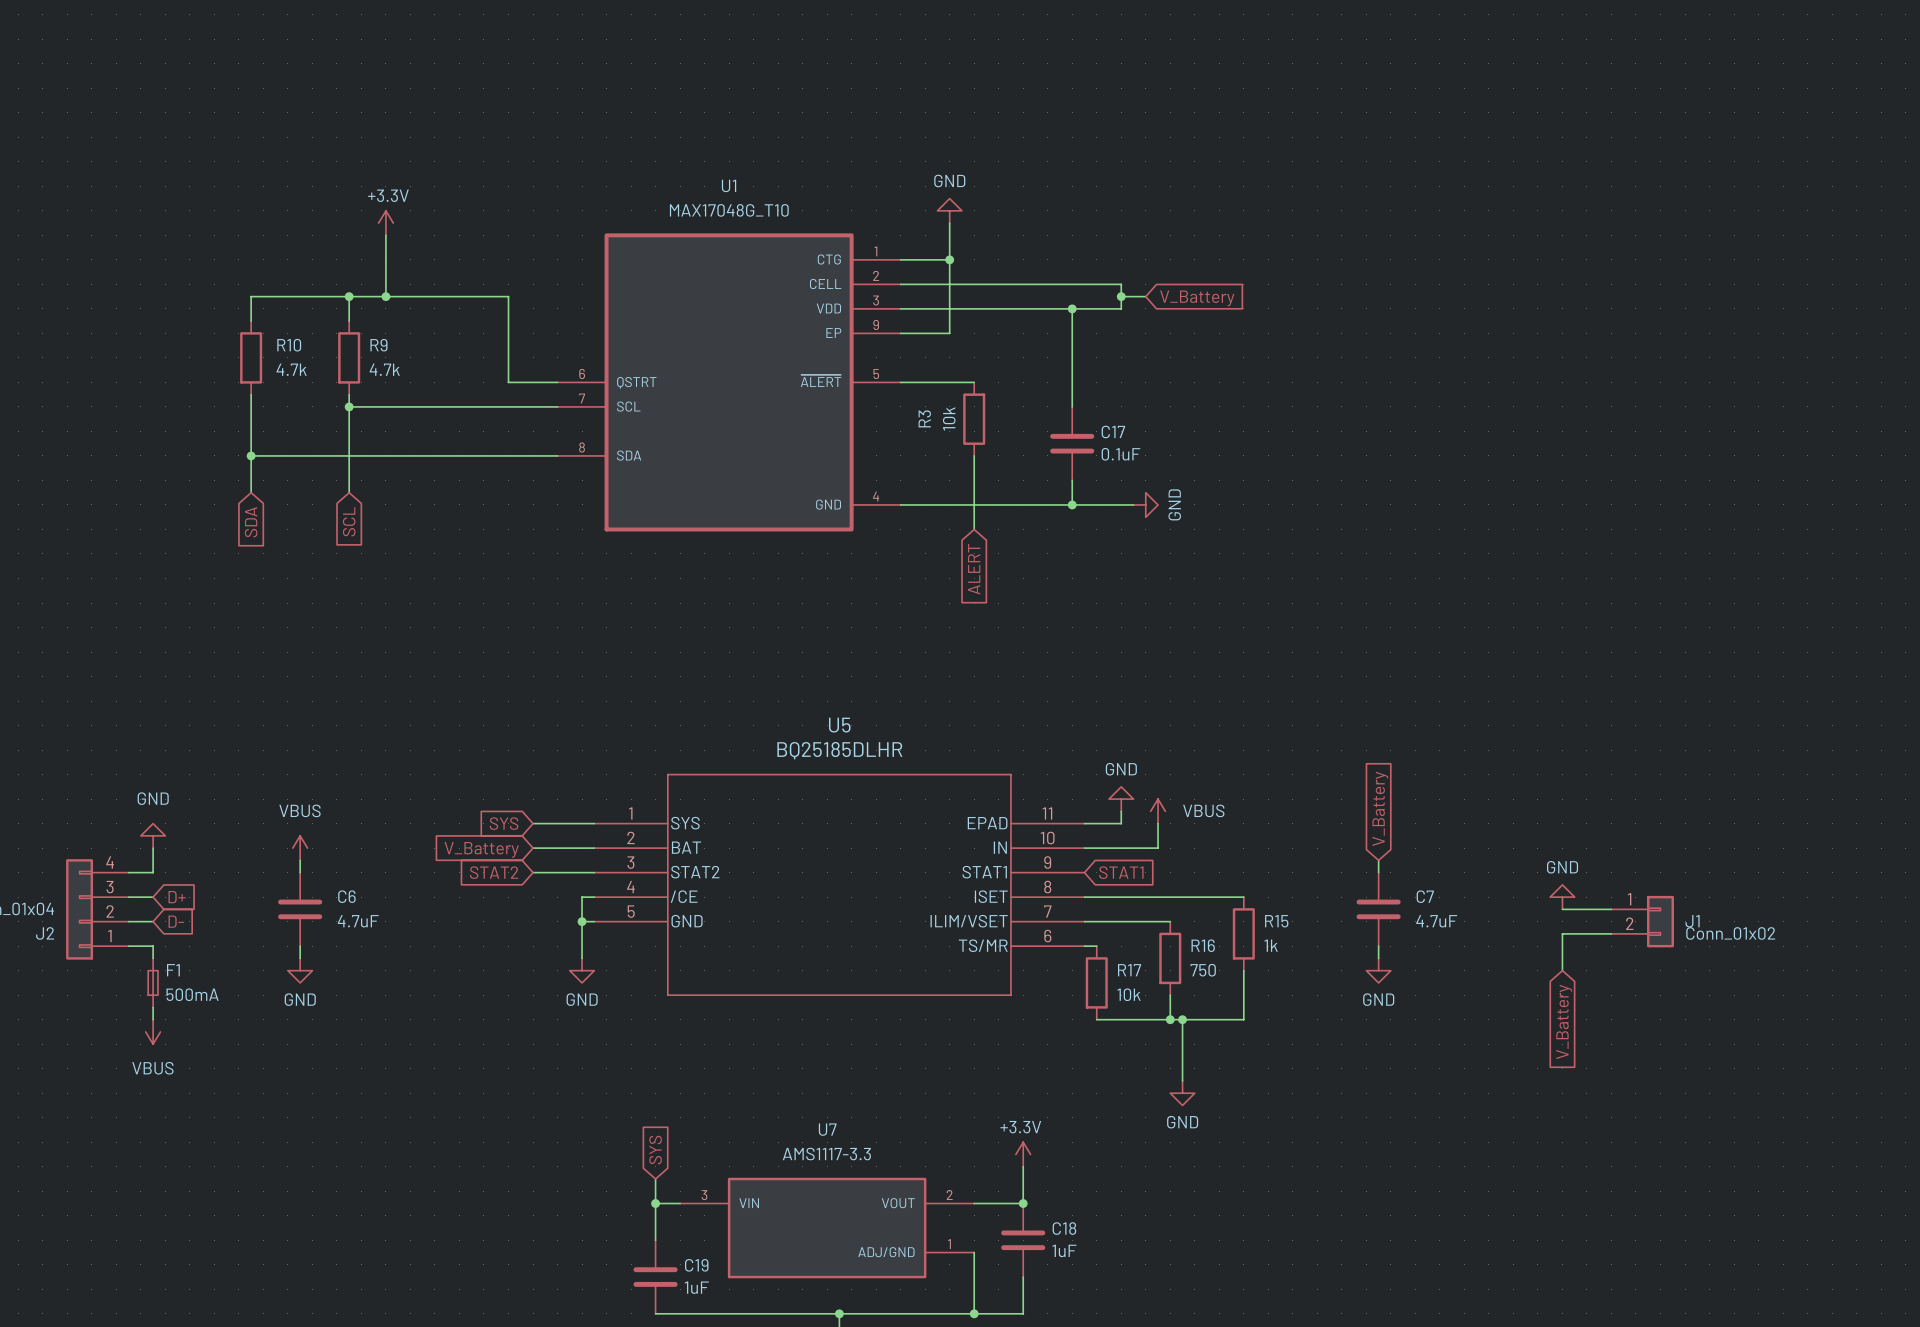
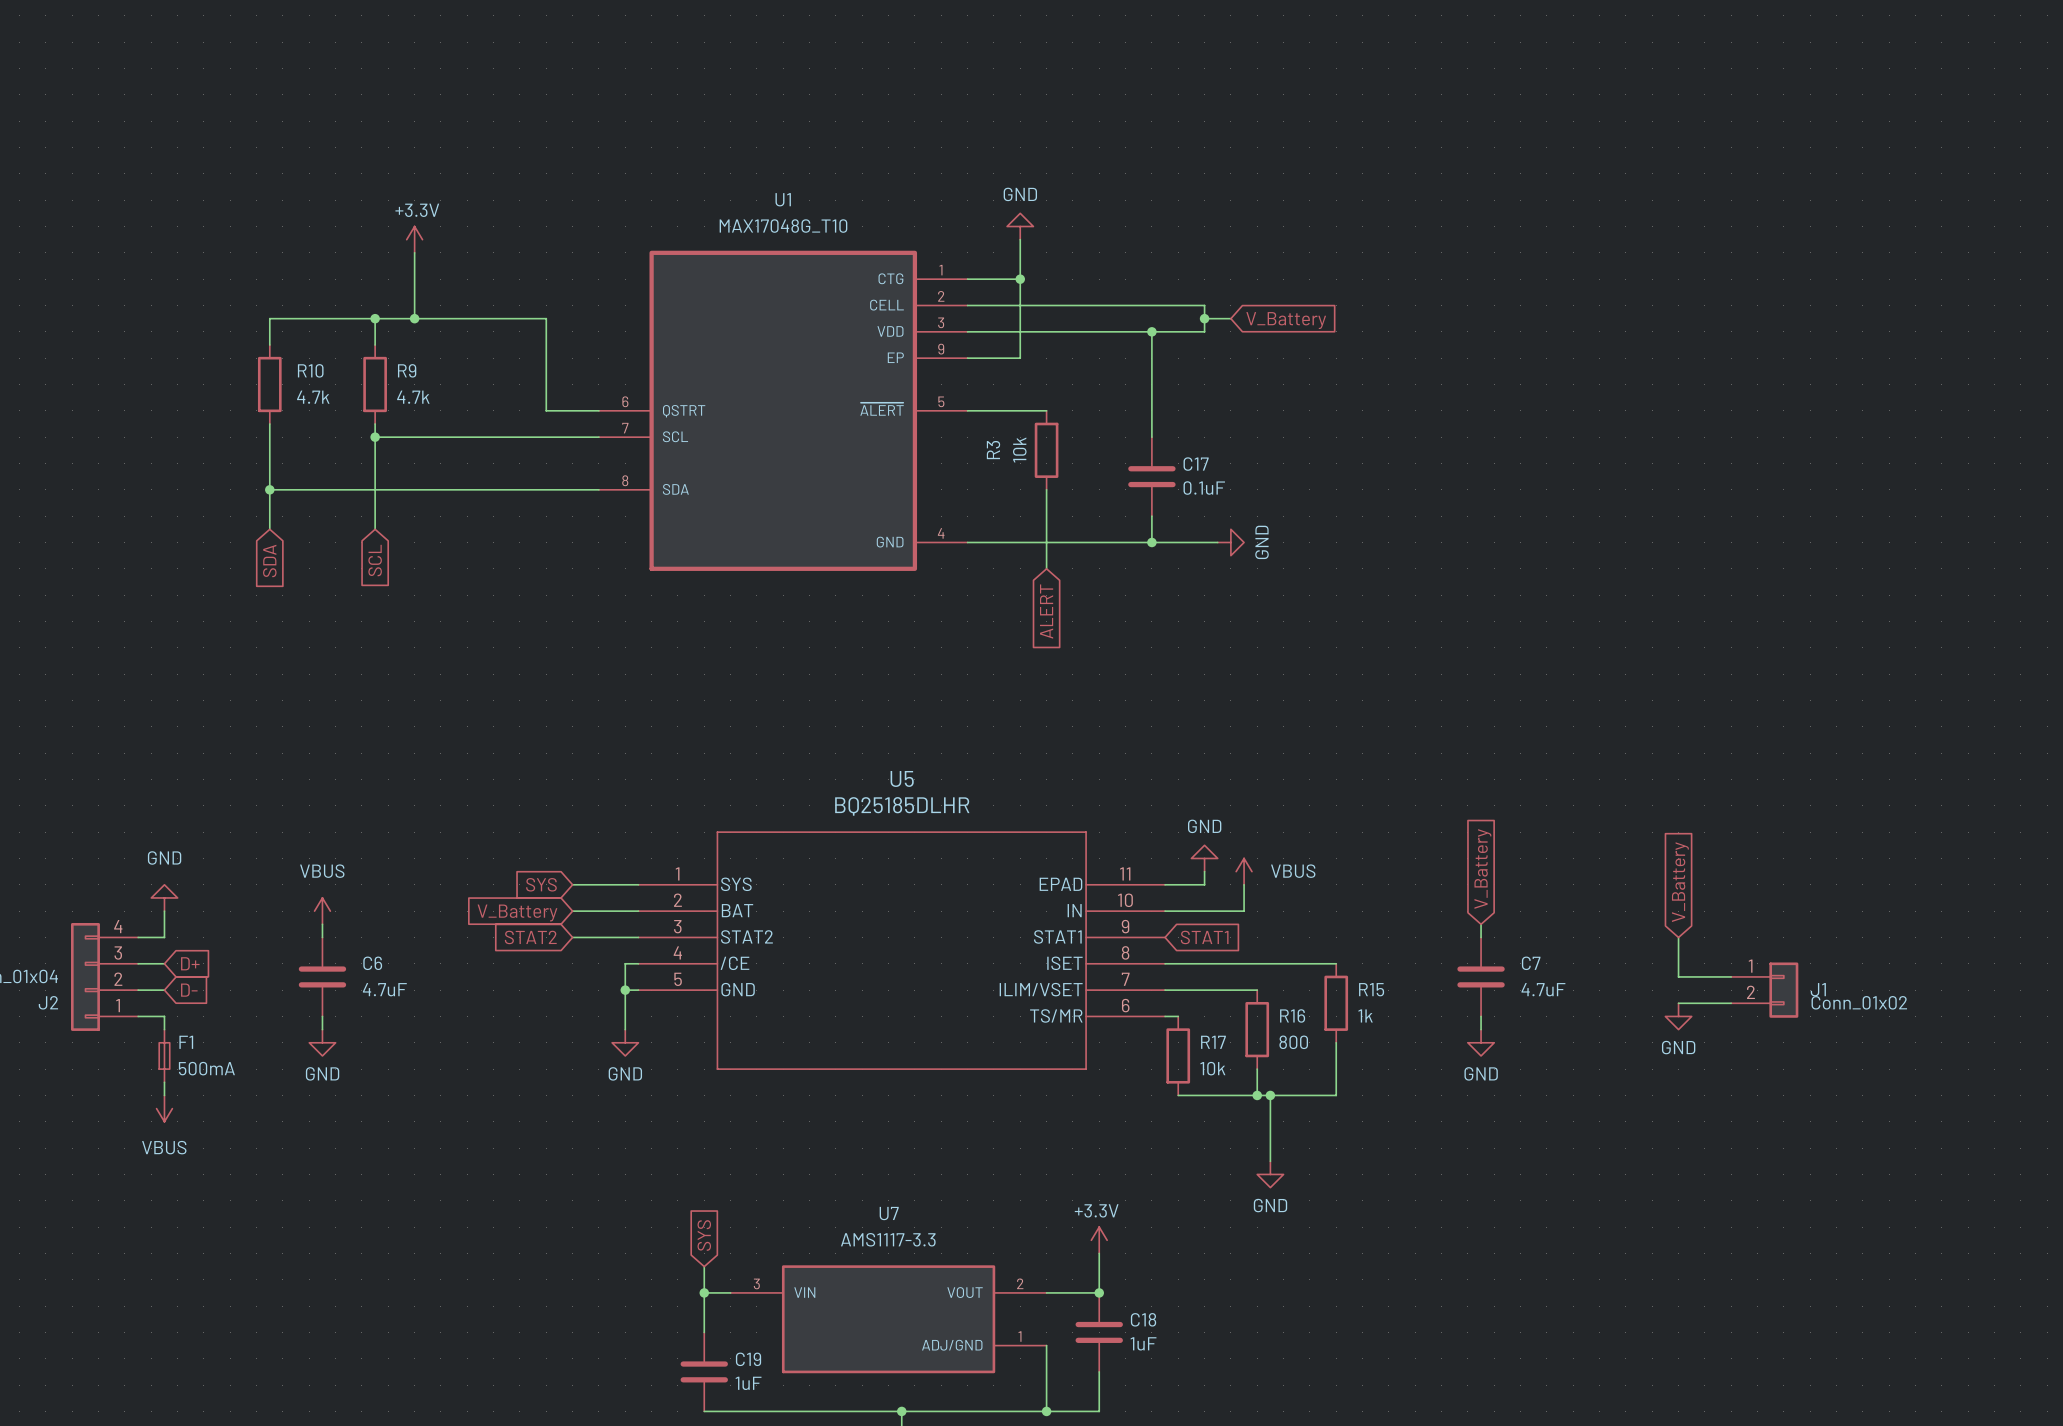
power symbol rotation: 0° (1562, 897) -> 180° (1678, 1016)
power symbol position: GND (1562, 897) -> GND (1678, 1016)
wire: (1562, 933) (1562, 970) -> (1678, 937) (1678, 976)
R16 value: 750 (1203, 970) -> 800 (1293, 1042)
global label rotation: 0° (1564, 1021) -> 180° (1680, 882)
global label position: V_Battery (1564, 1021) -> V_Battery (1680, 882)

